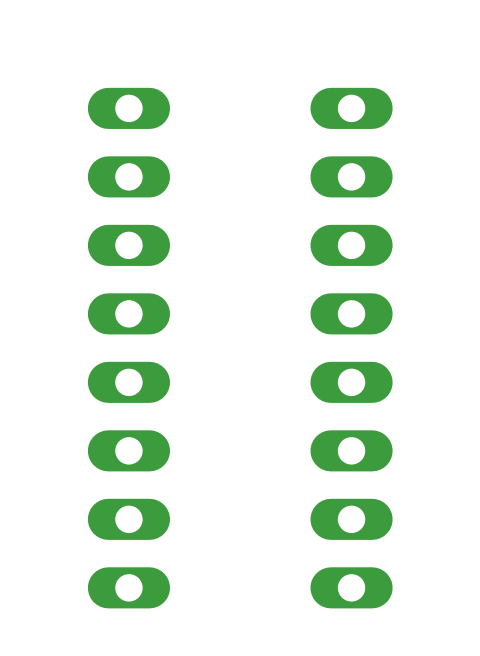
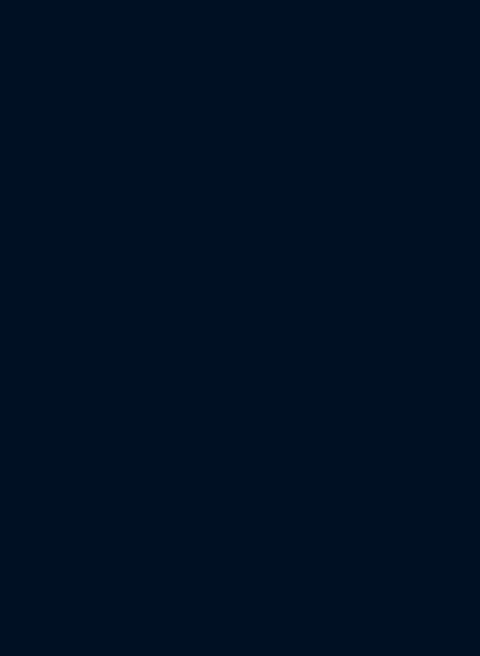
part: (128, 348) -> none
part: (351, 348) -> none

